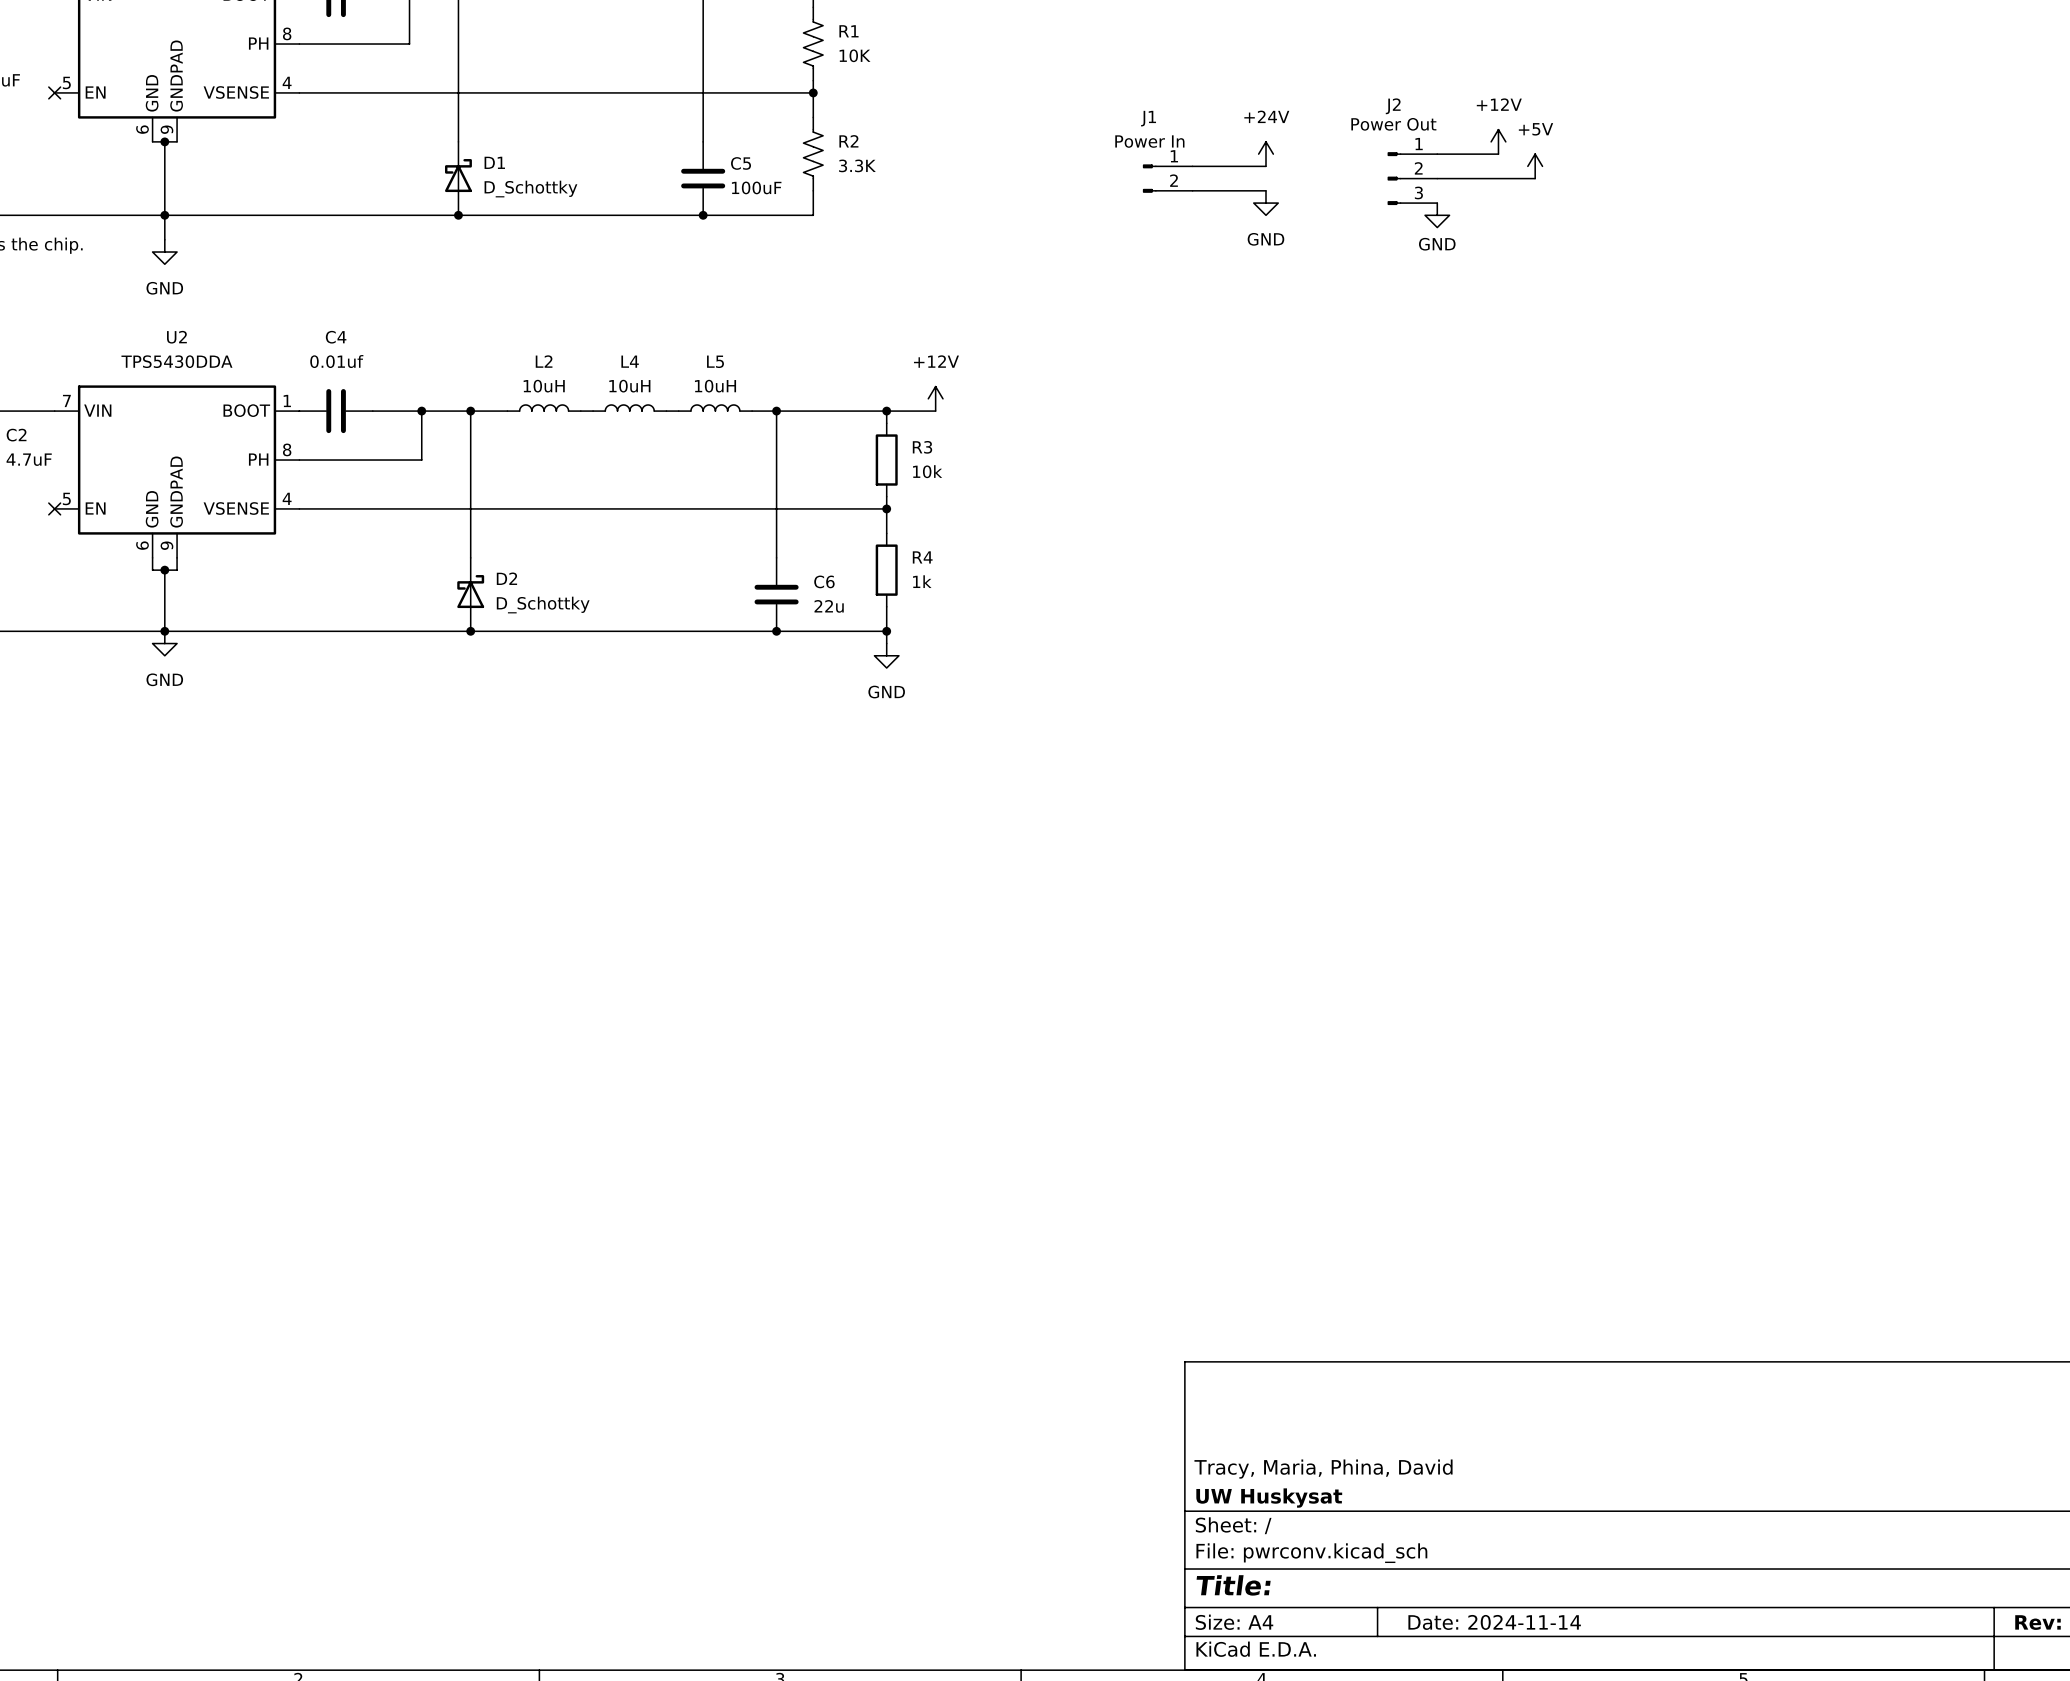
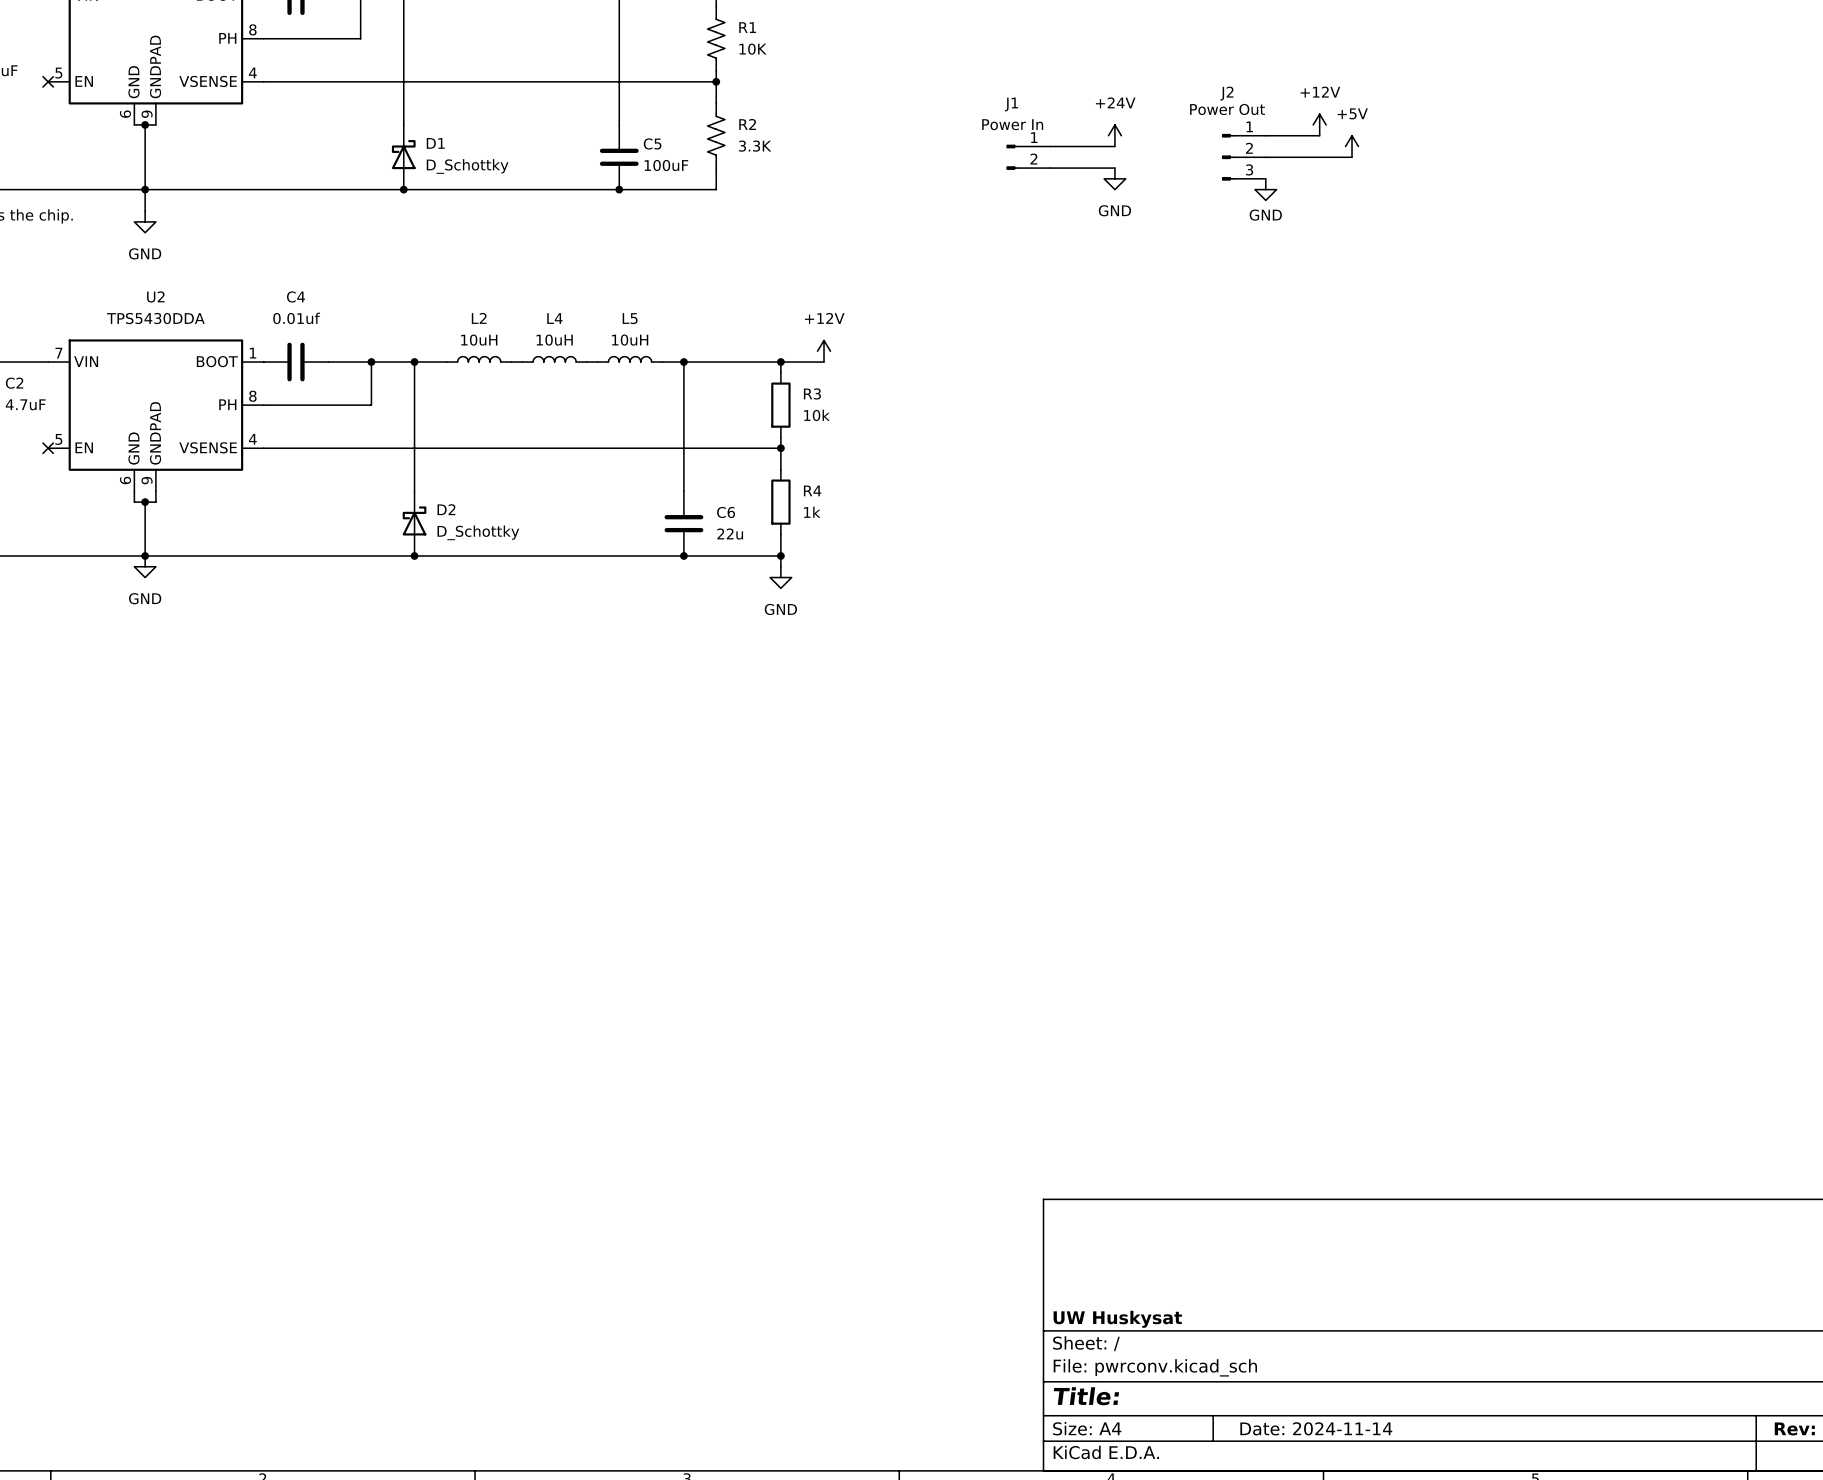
title block: Tracy, Maria, Phina, David (1323, 1469) -> none

